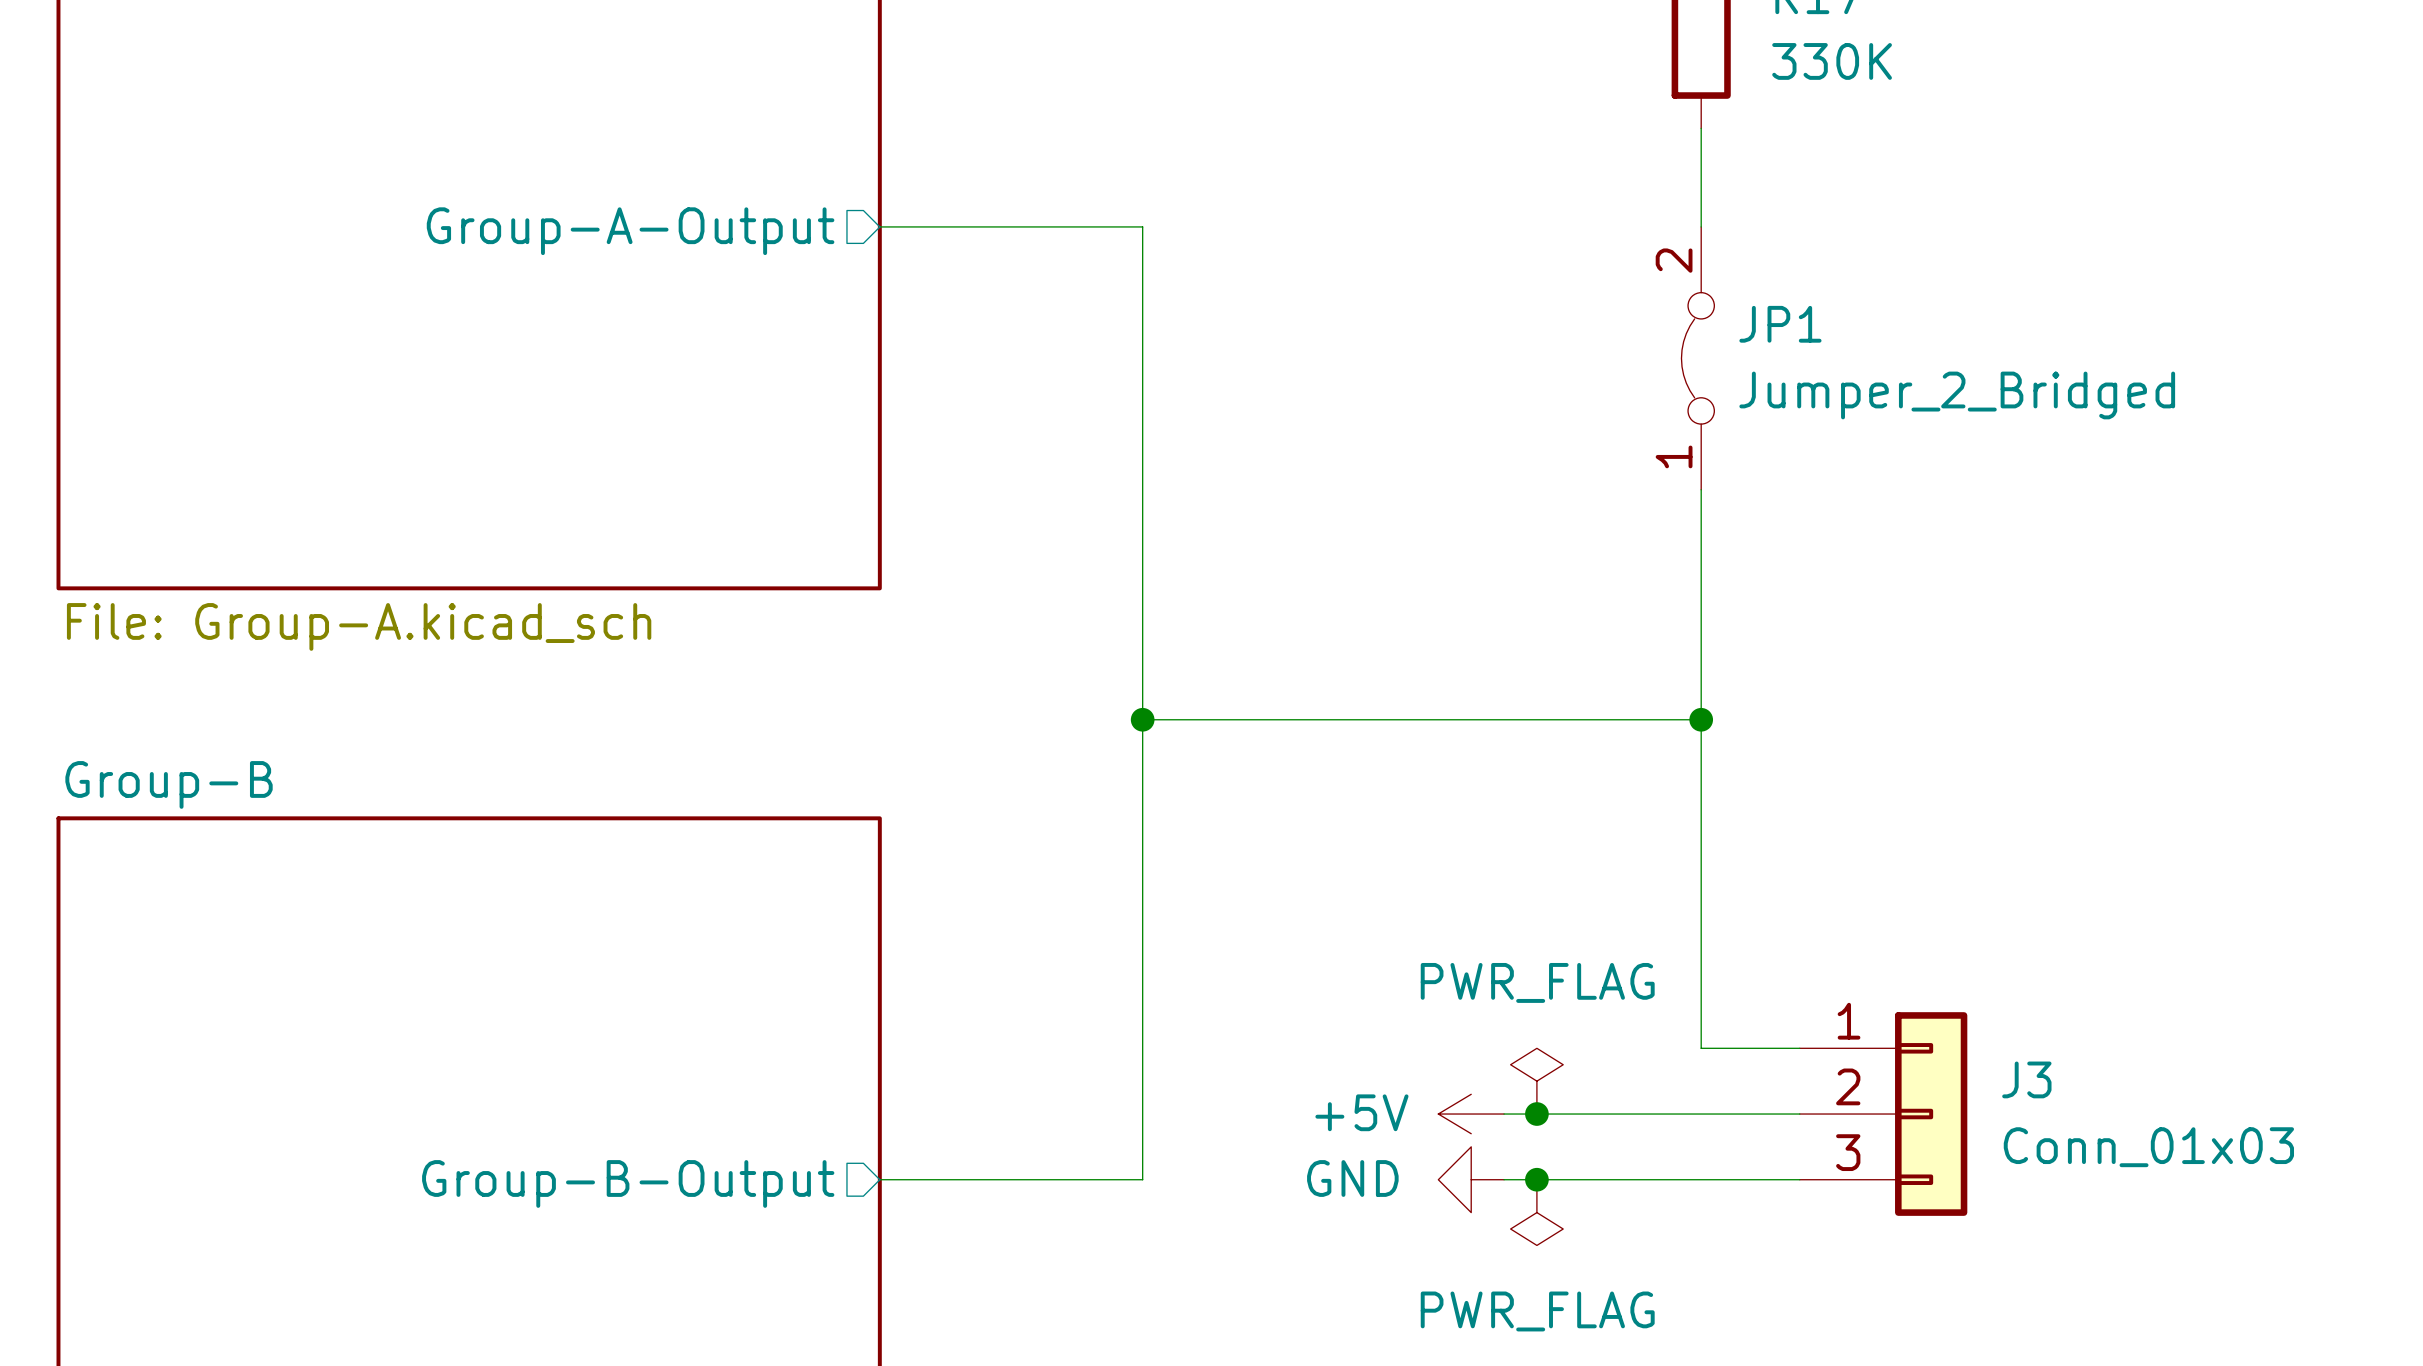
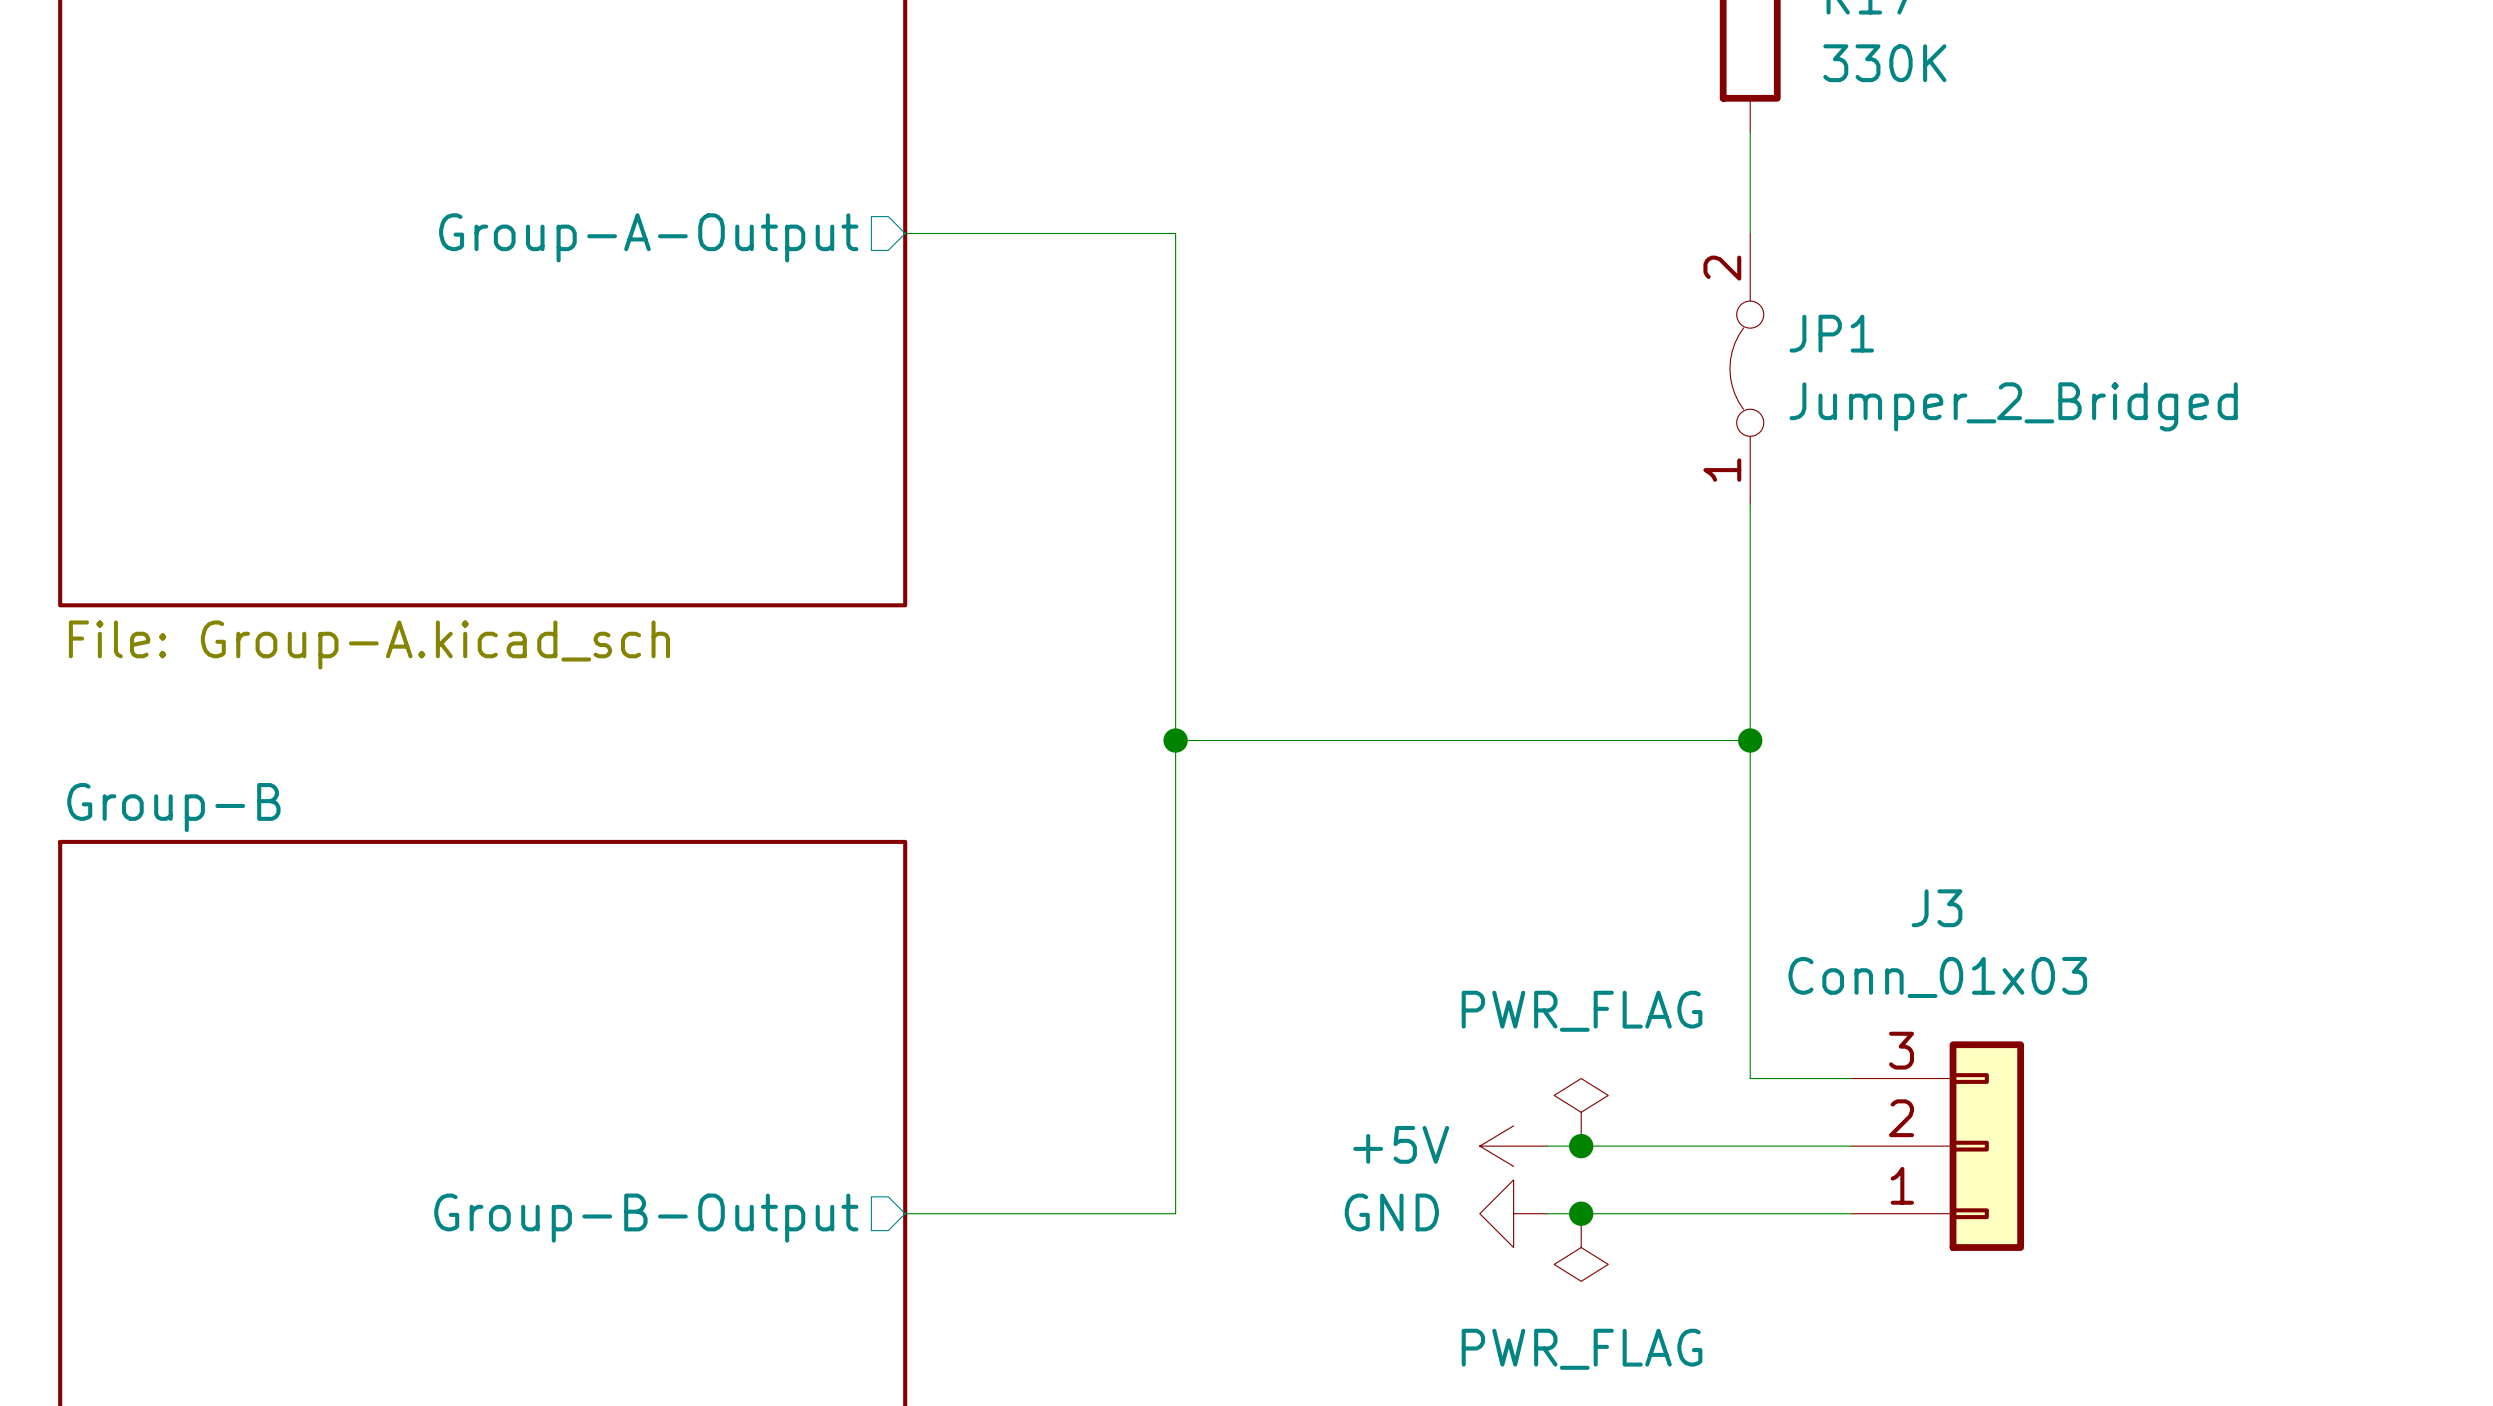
J3 name position: J3 (2026, 1079) -> J3 (1937, 908)
J3 flip: as is (1931, 1114) -> up-down (1986, 1146)
J3 value position: Conn_01x03 (2148, 1147) -> Conn_01x03 (1937, 977)

